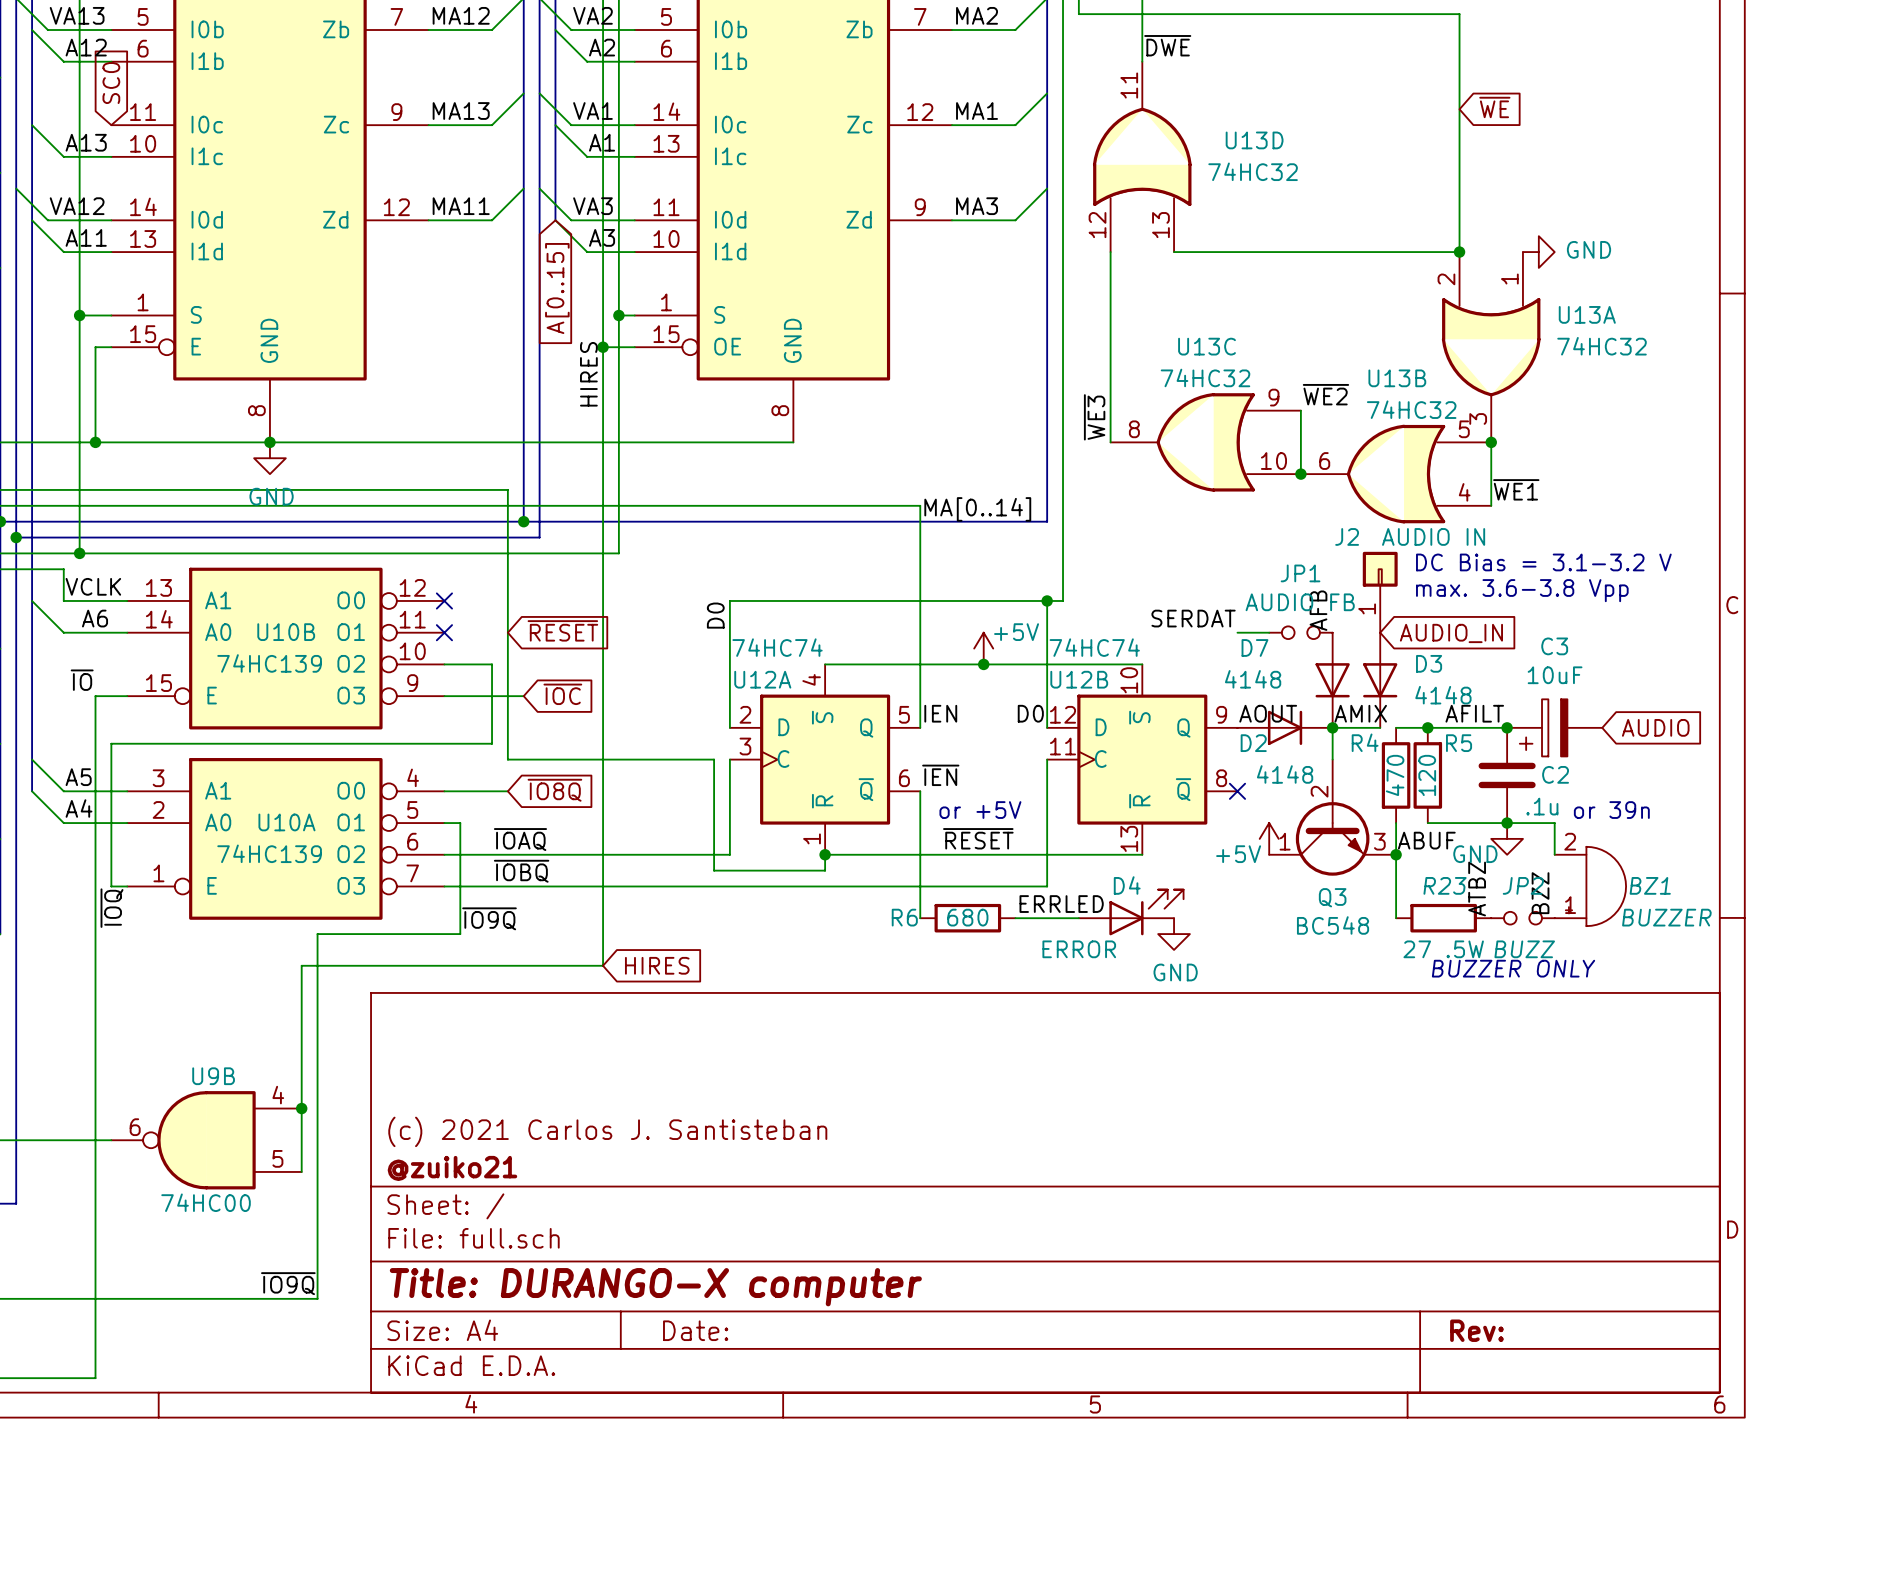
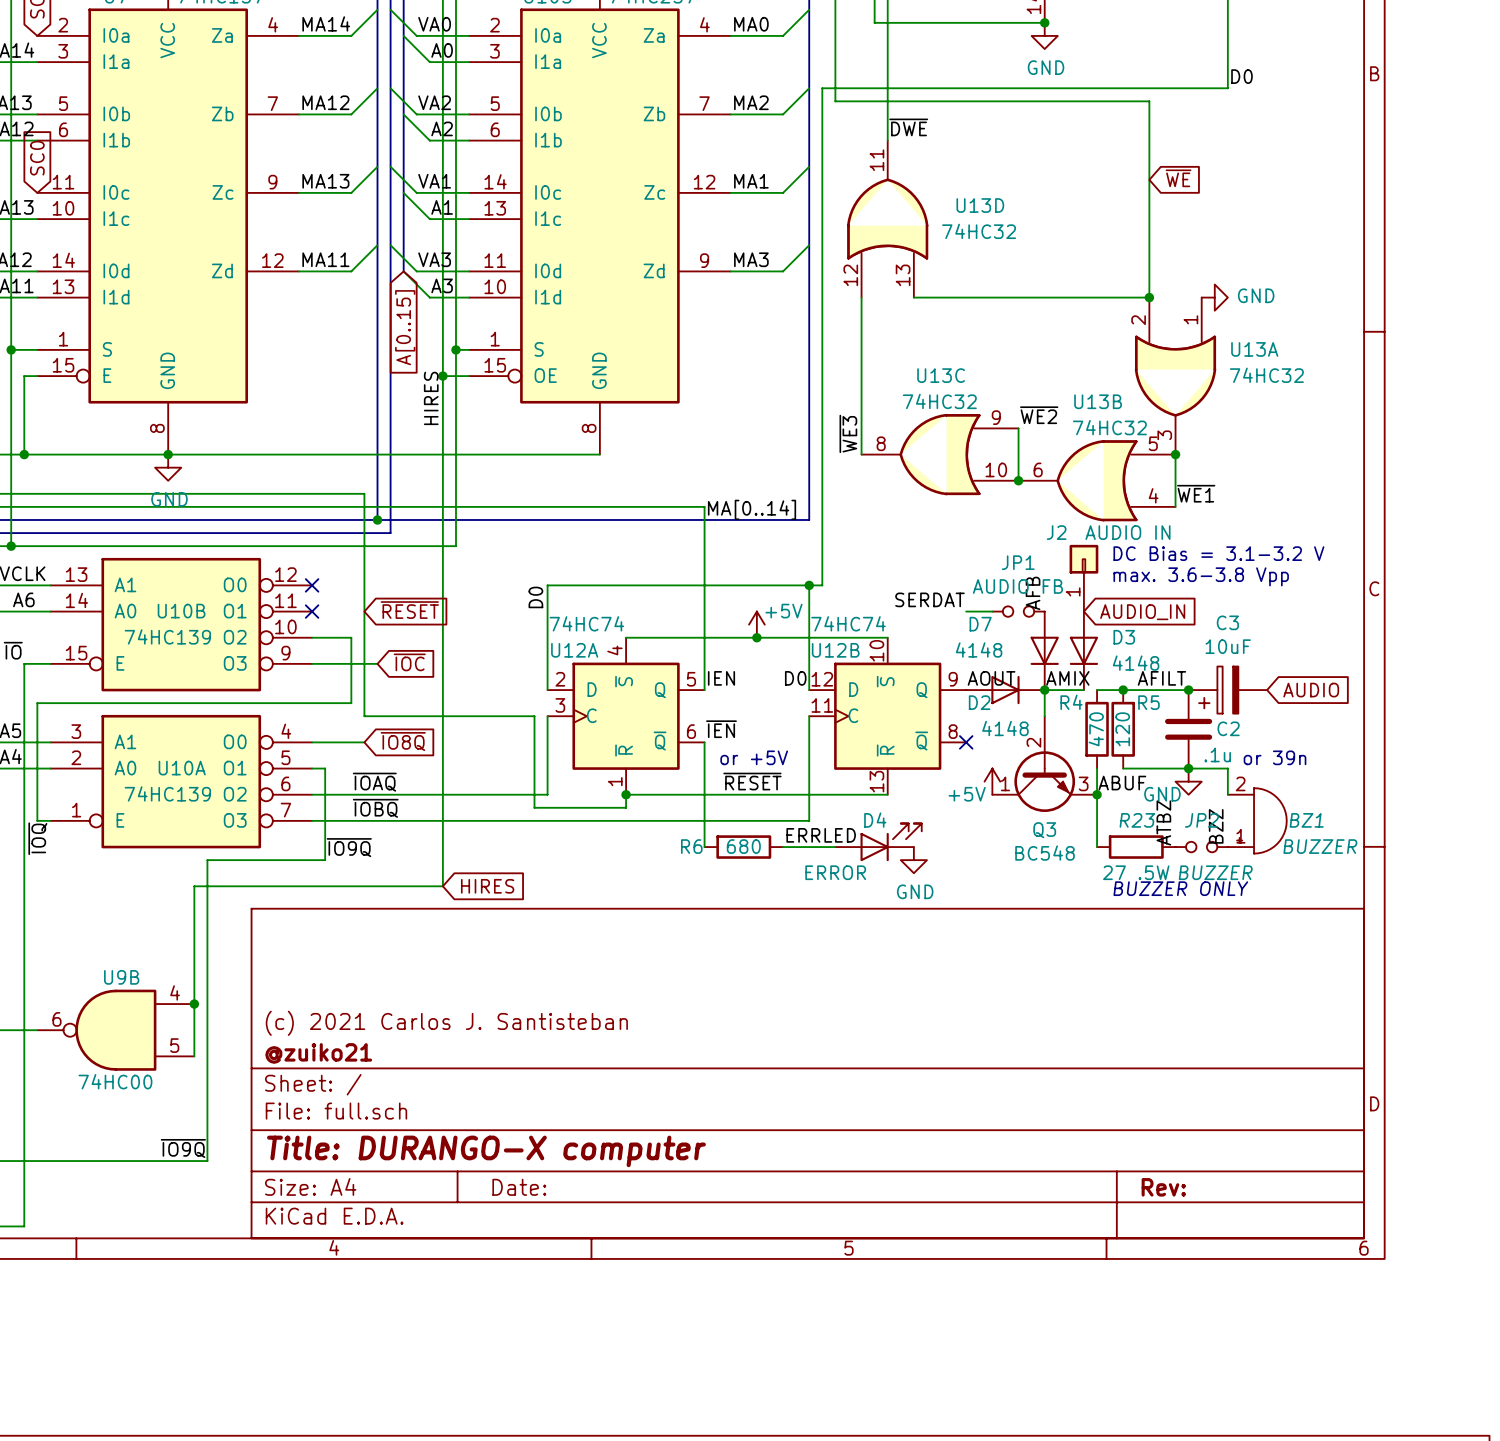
JP2 value: BUZZ (1524, 949) -> BUZZER (1215, 872)
text position: BUZZER ONLY (1513, 968) -> BUZZER ONLY (1180, 888)

